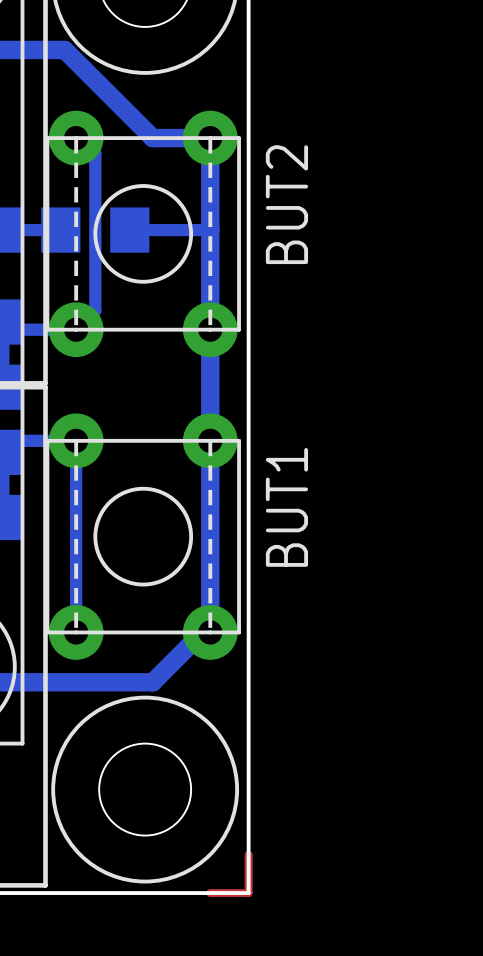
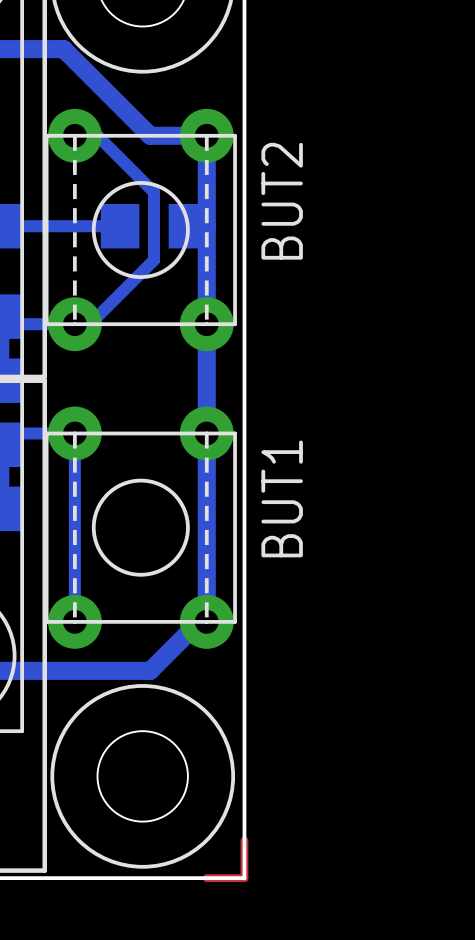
bottom track: (79, 138) (95, 153) (95, 310) (76, 329) -> (78, 135) (97, 135) (154, 192) (154, 260) (89, 324) (74, 324)
part position: (95, 230) -> (154, 226)
bottom track: (129, 230) (191, 230) -> (59, 226) (120, 226)

